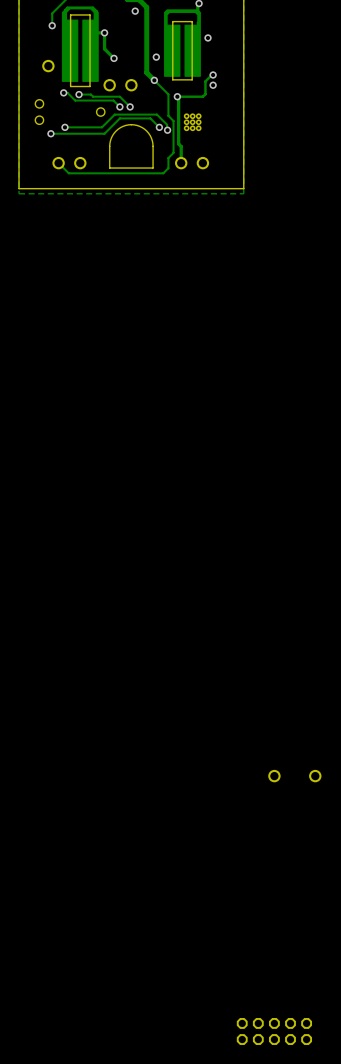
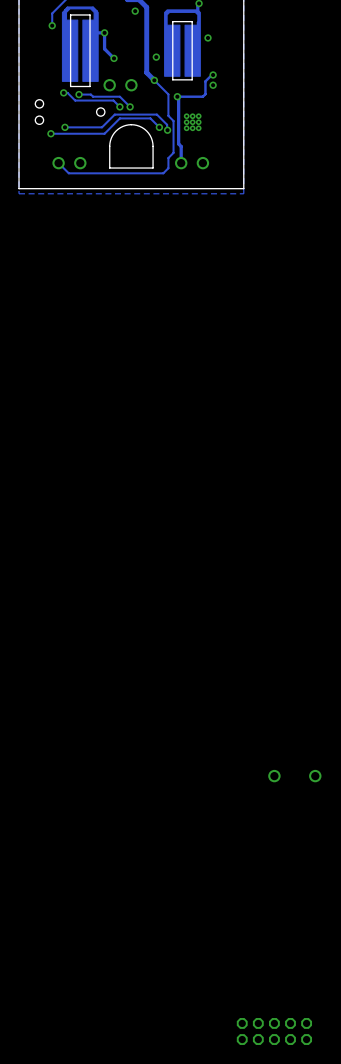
part: (48, 66) -> none

